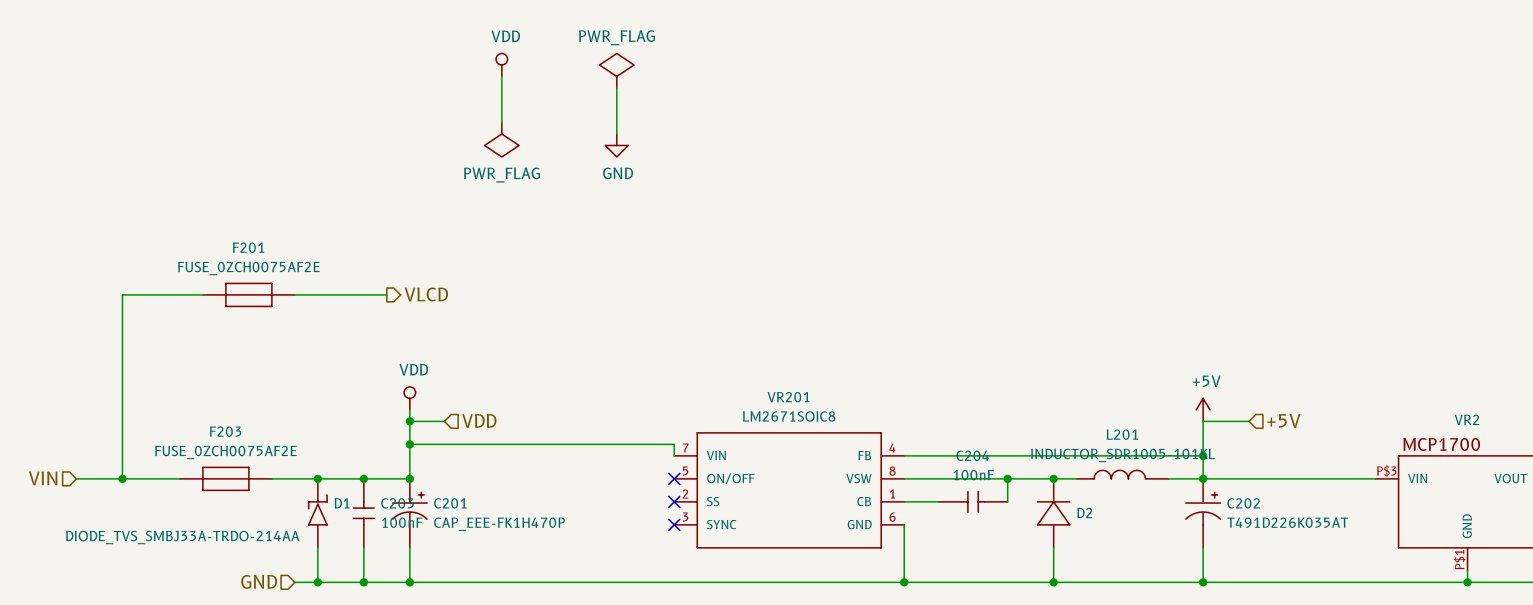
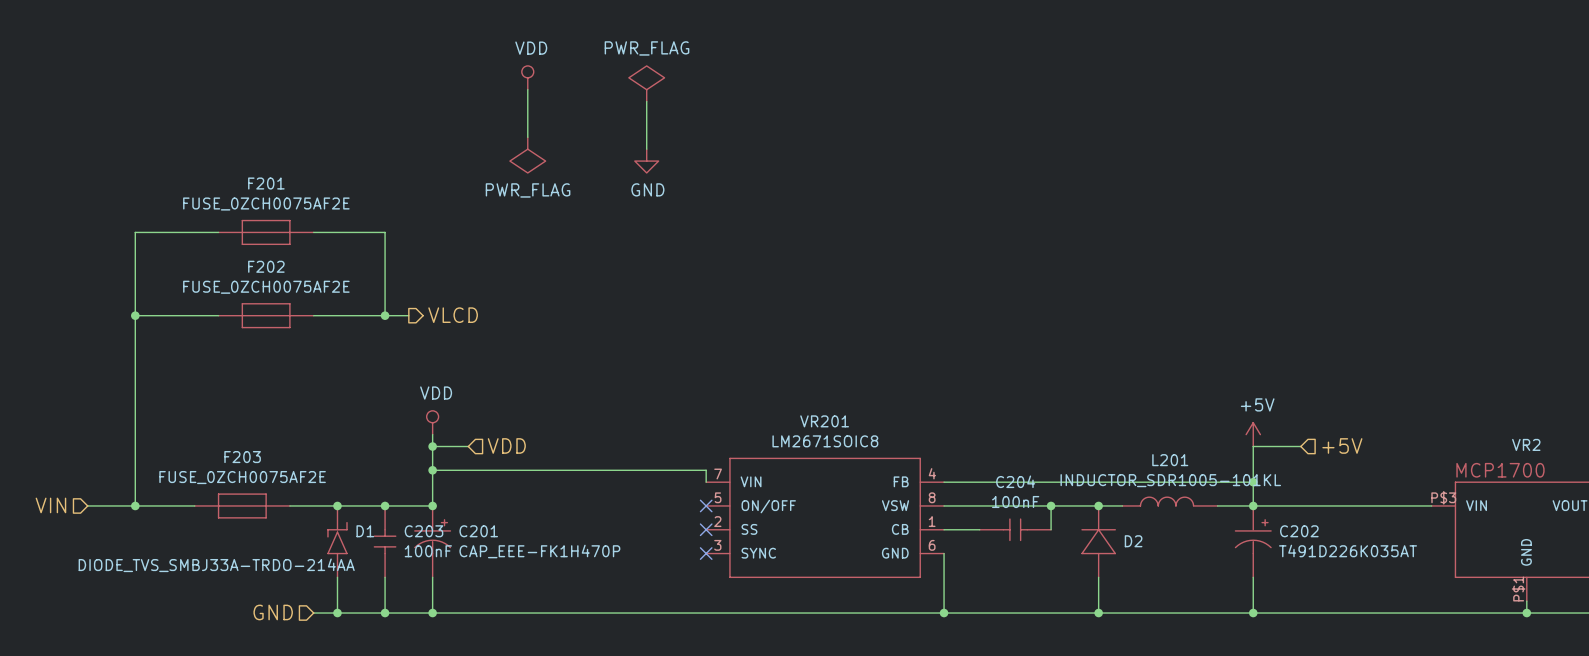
wire: none -> (218, 232) (135, 232) (135, 315)
F201: none -> FUSE_0ZCH0075AF2E (266, 232)
wire: none -> (313, 232) (385, 232) (385, 315)
F201 name: F201 (248, 247) -> F202 (266, 266)
junction: none -> (135, 315)
junction: none -> (385, 315)

